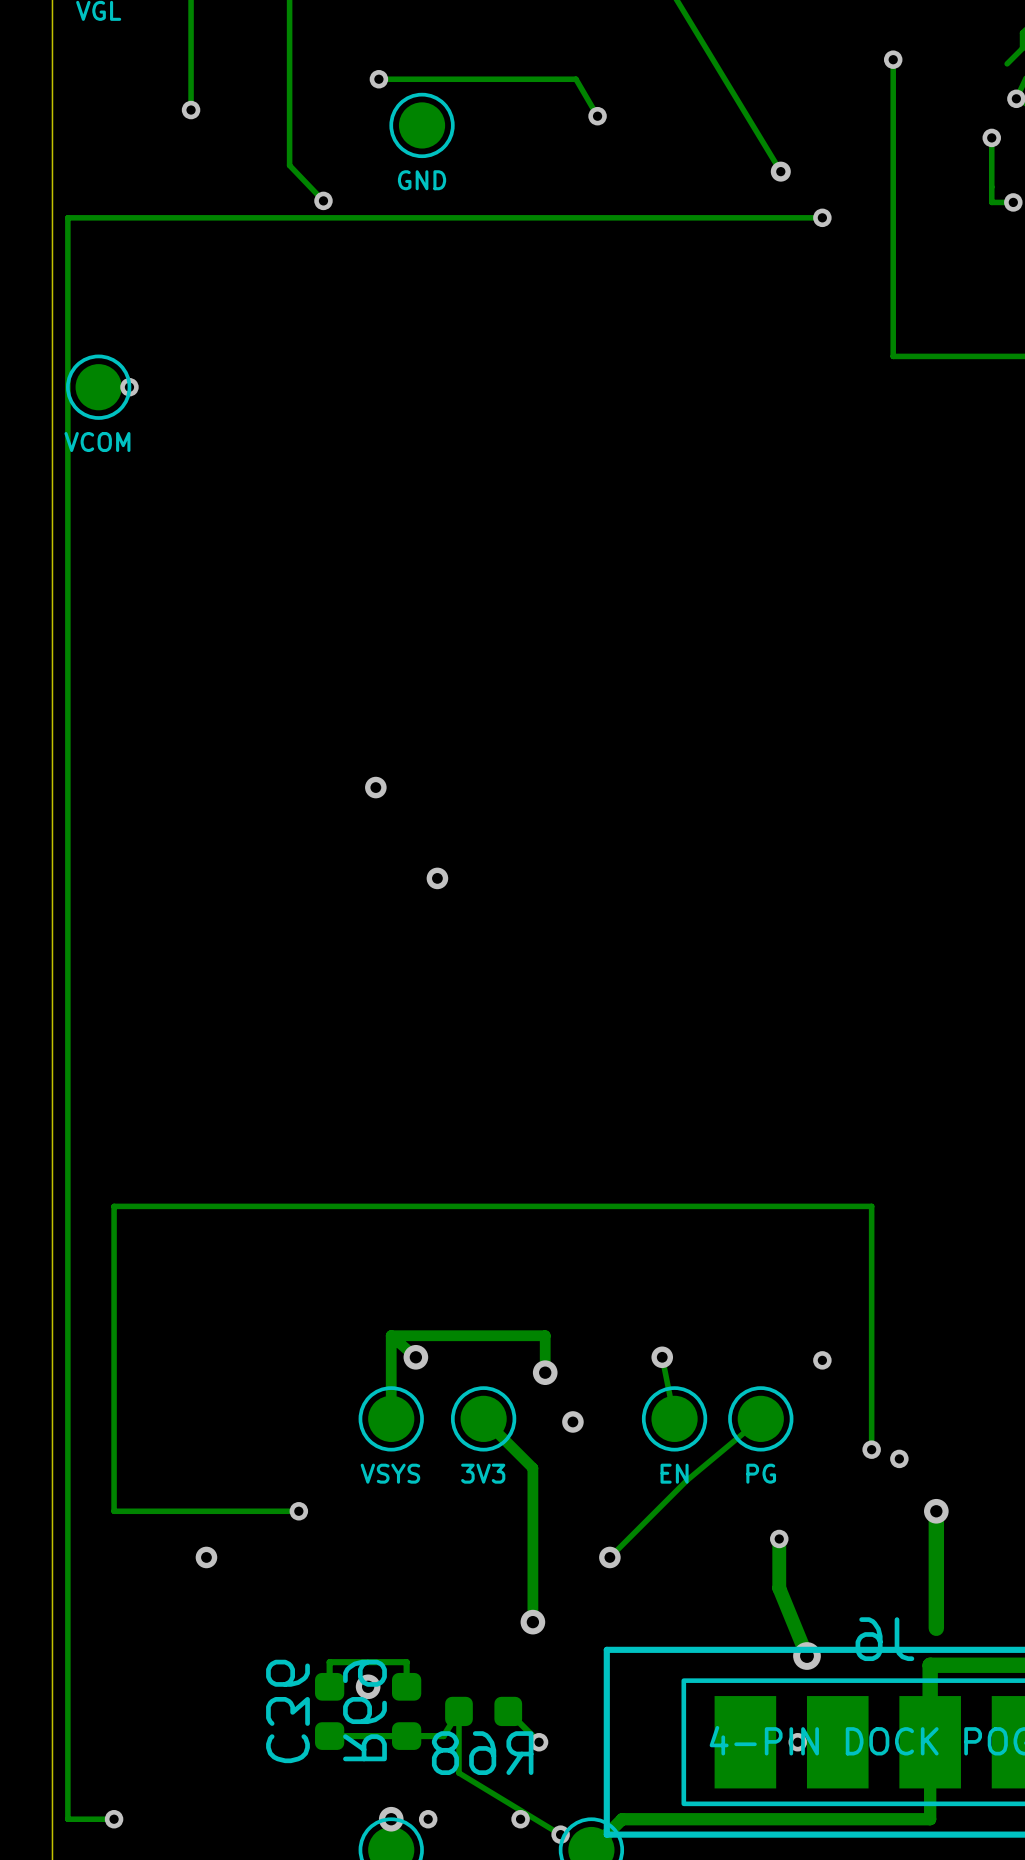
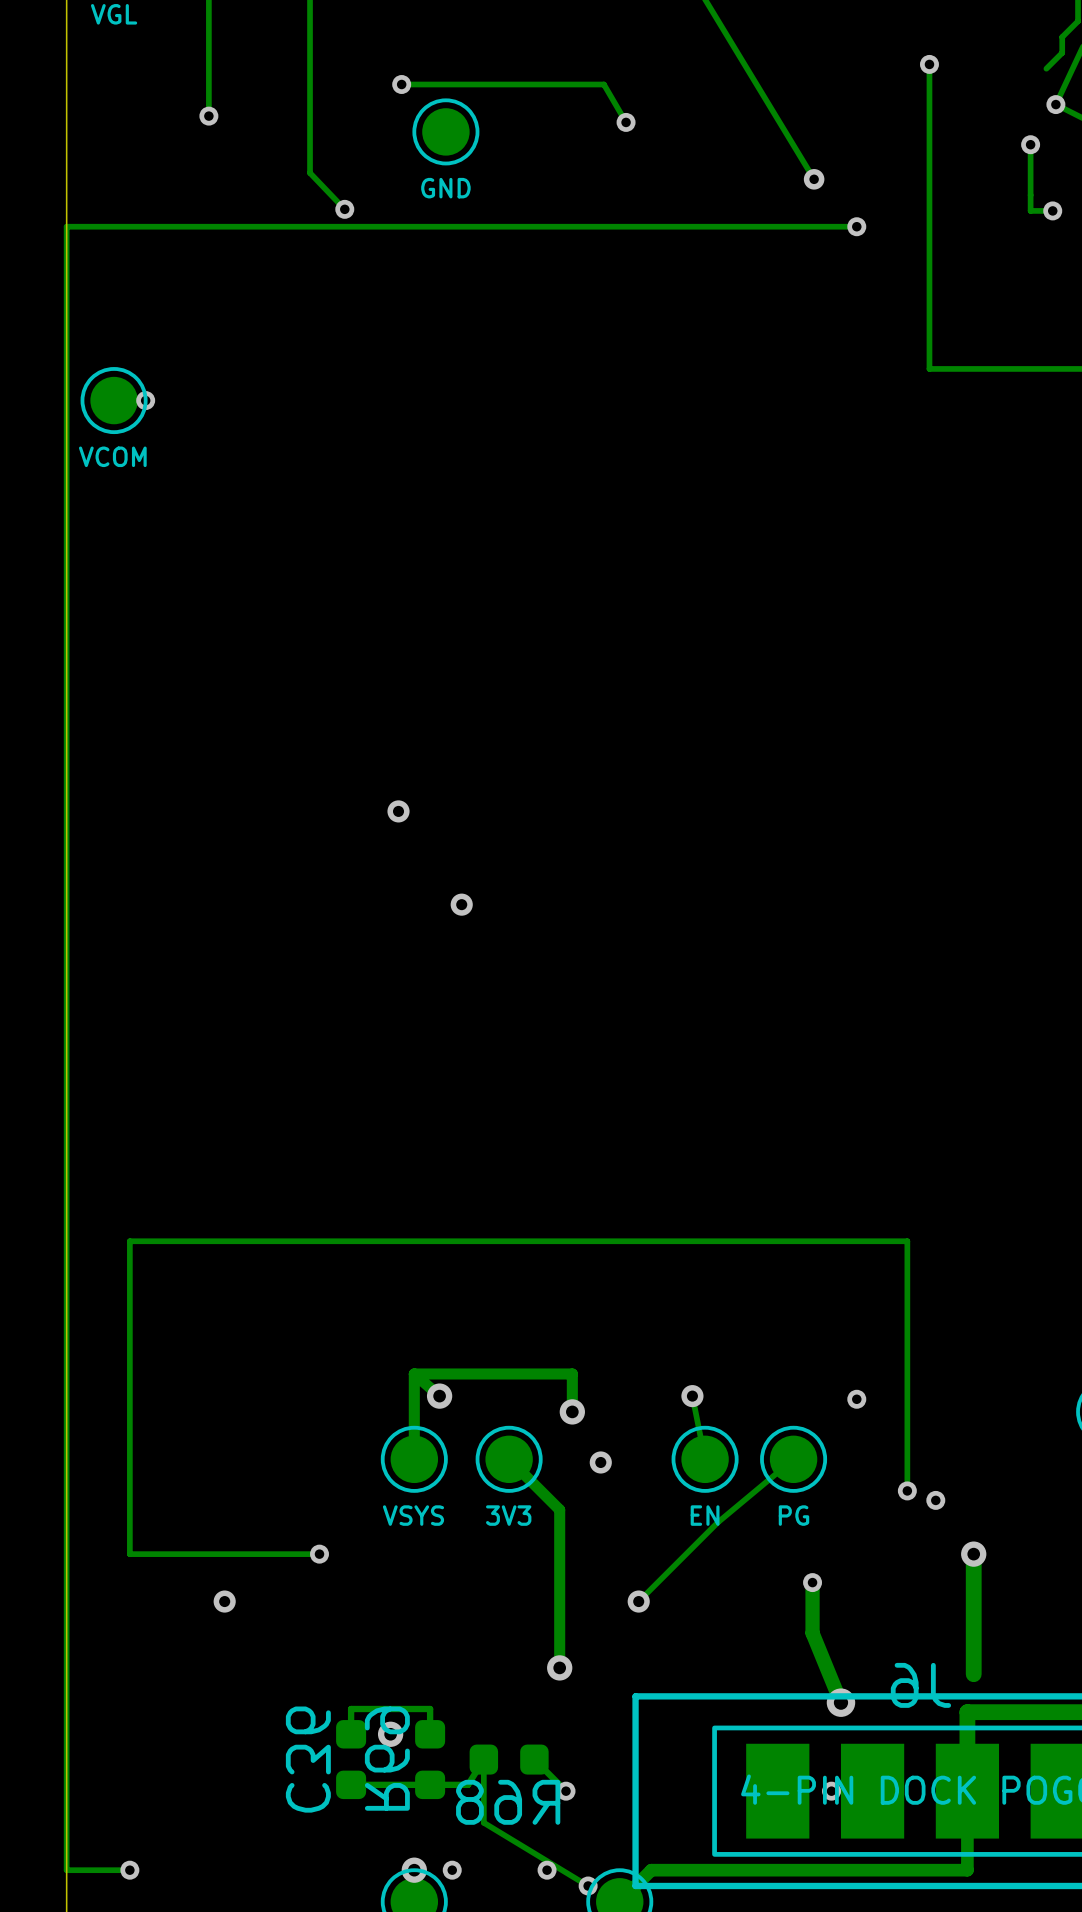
track: (67, 217) (67, 1819) -> (82, 226) (66, 226) (66, 1870) (82, 1870)

